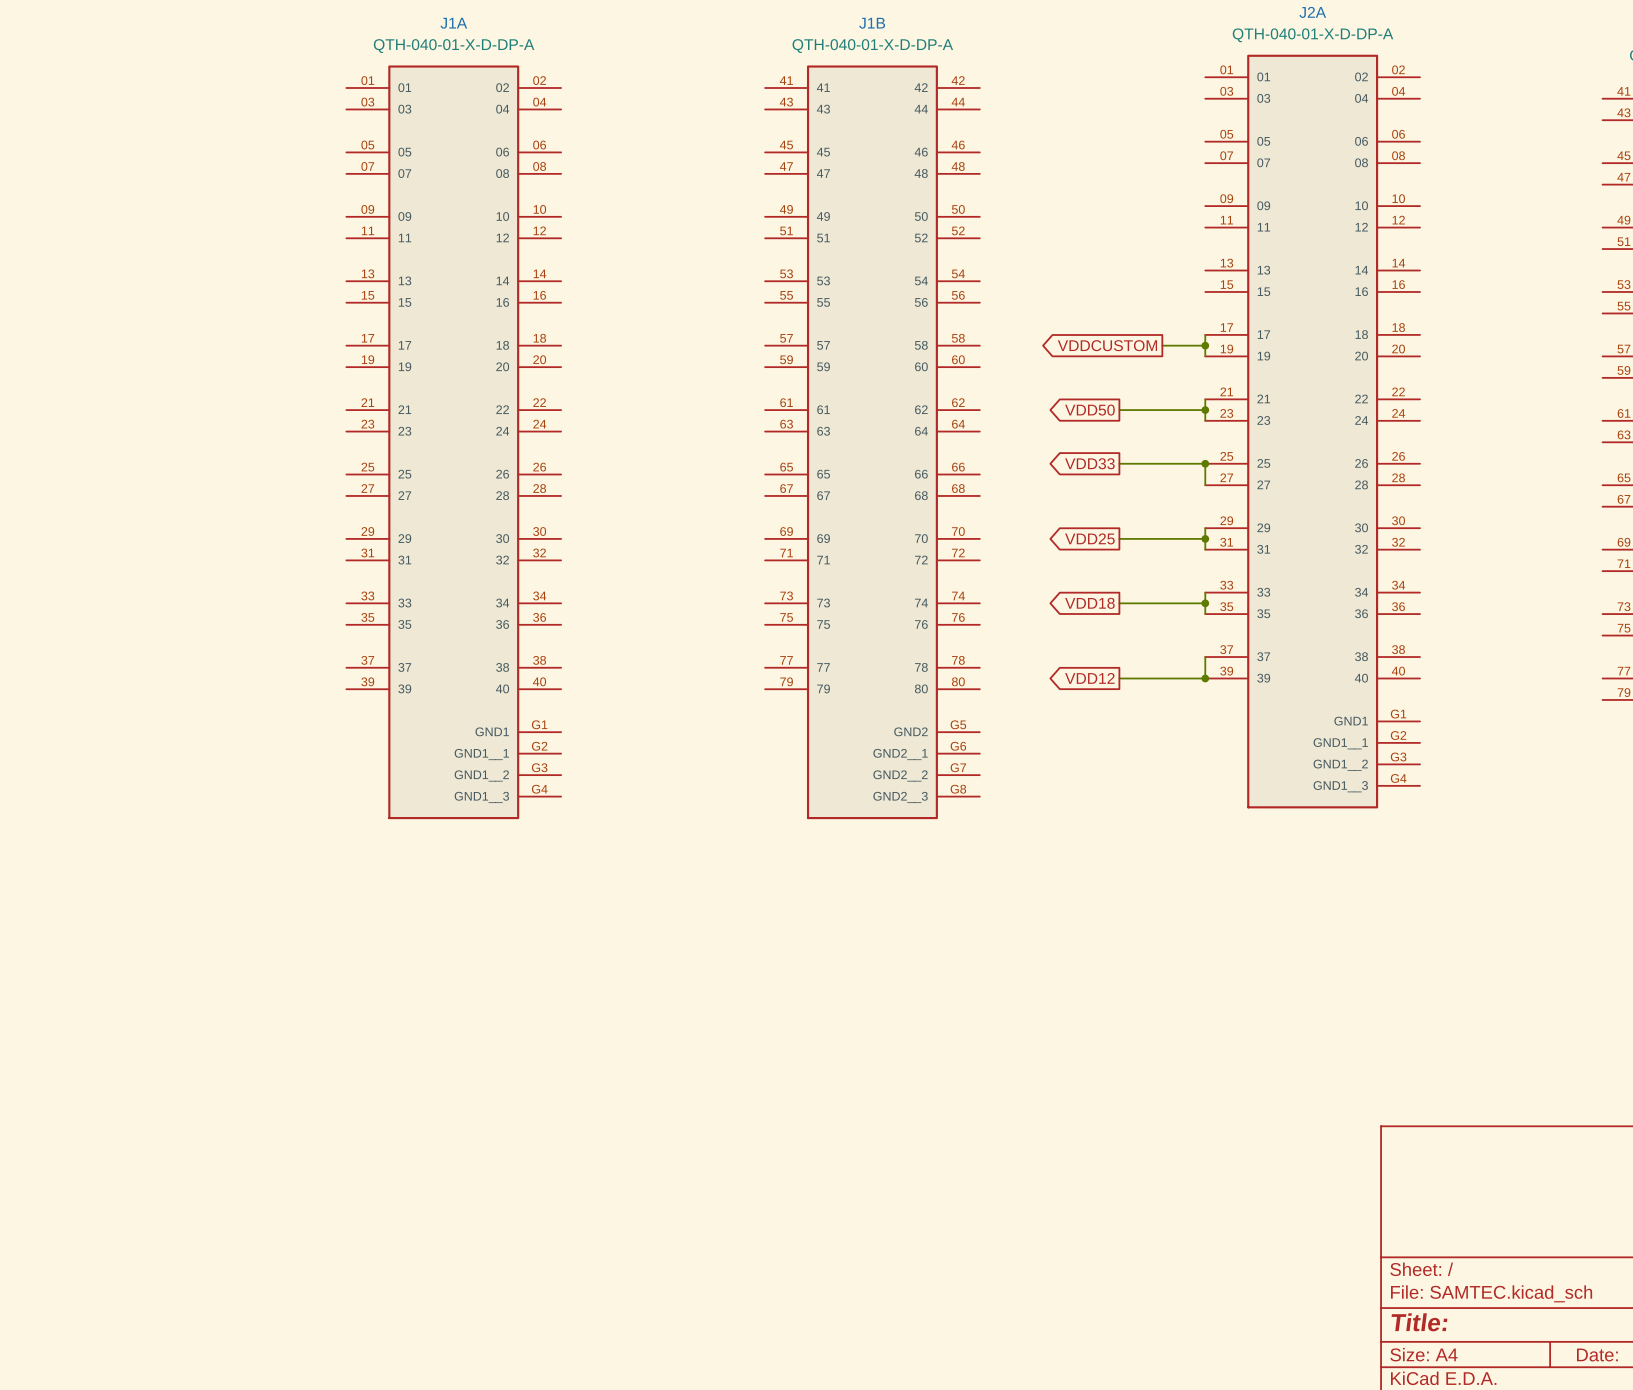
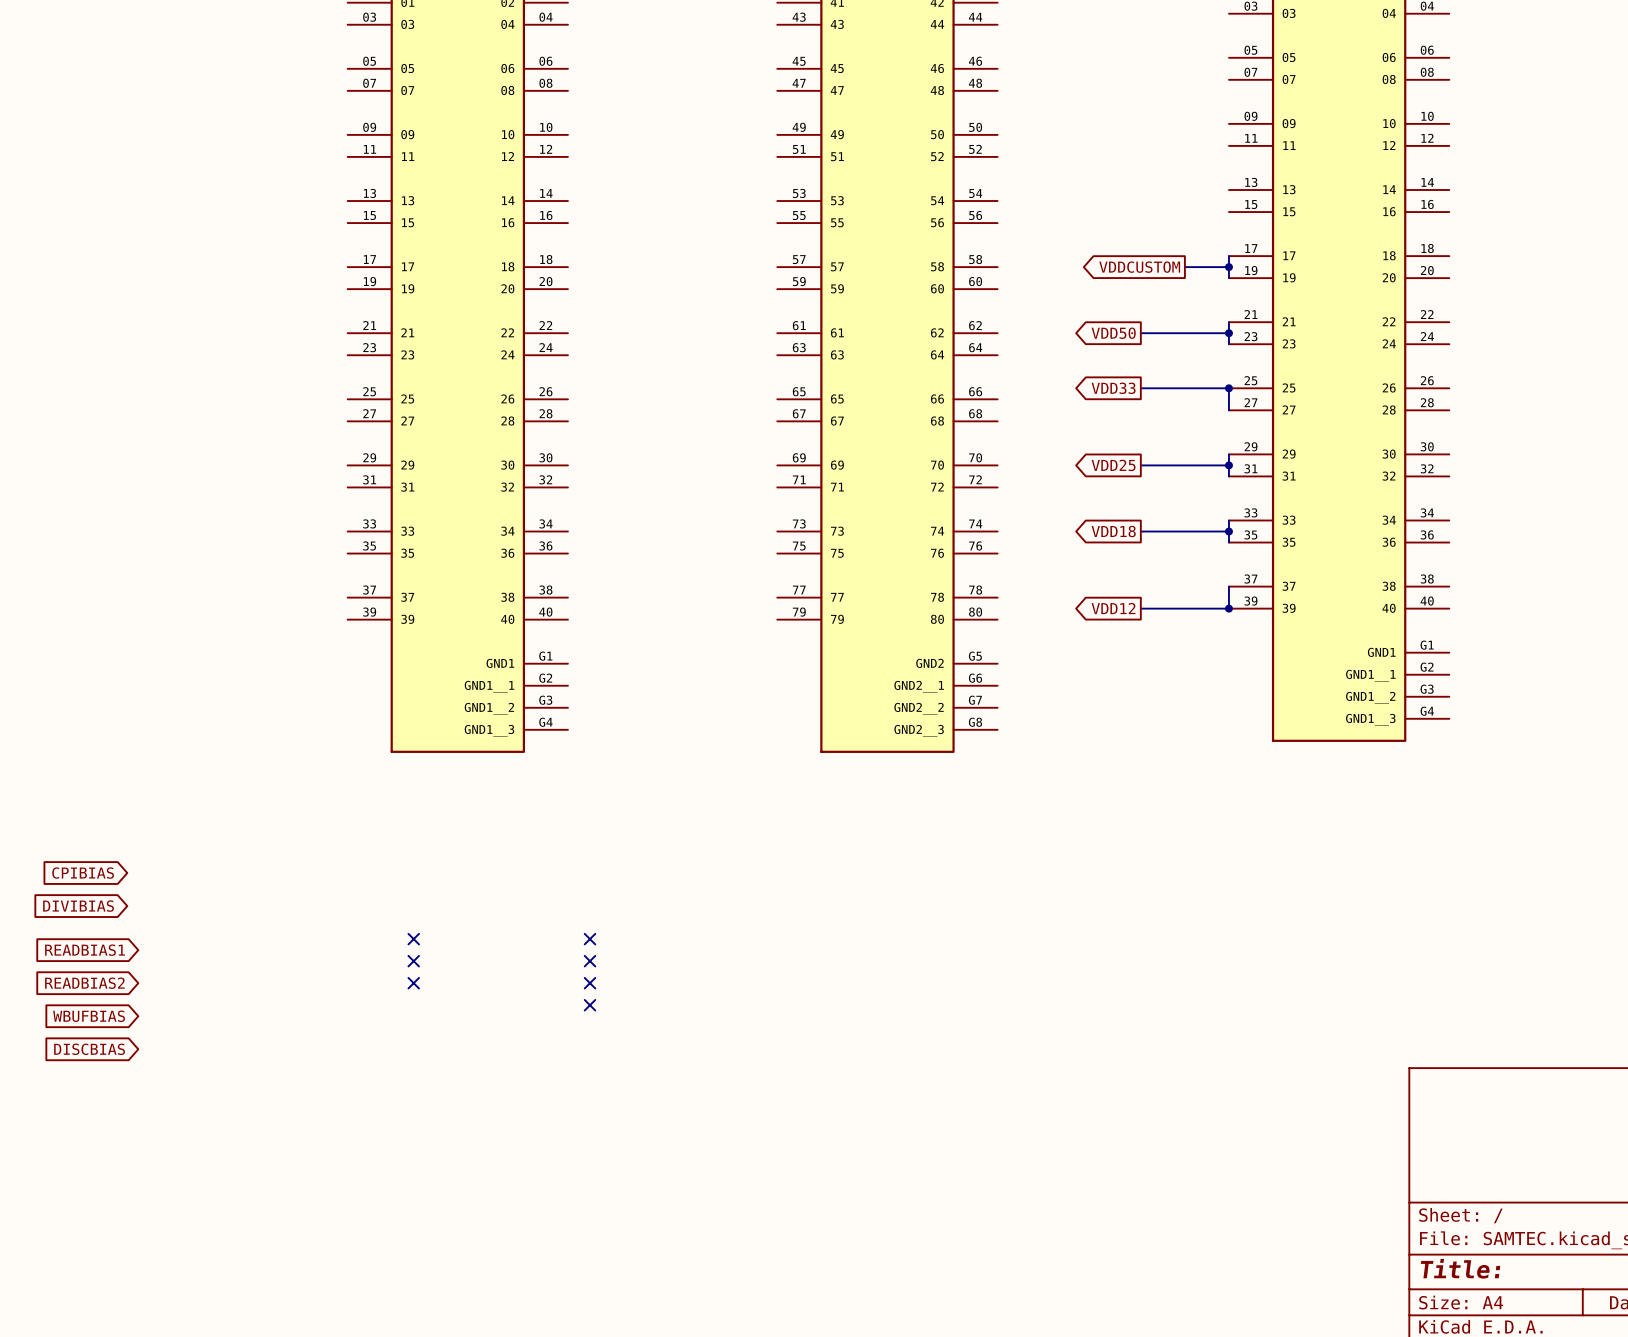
global label: none -> CPIBIAS (83, 873)
global label: none -> DIVIBIAS (78, 906)
no-connect mark: none -> (413, 939)
no-connect mark: none -> (590, 939)
global label: none -> READBIAS1 (85, 950)
no-connect mark: none -> (413, 961)
no-connect mark: none -> (590, 961)
global label: none -> READBIAS2 (84, 983)
no-connect mark: none -> (413, 983)
no-connect mark: none -> (590, 983)
no-connect mark: none -> (590, 1005)
global label: none -> WBUFBIAS (89, 1016)
global label: none -> DISCBIAS (89, 1049)

